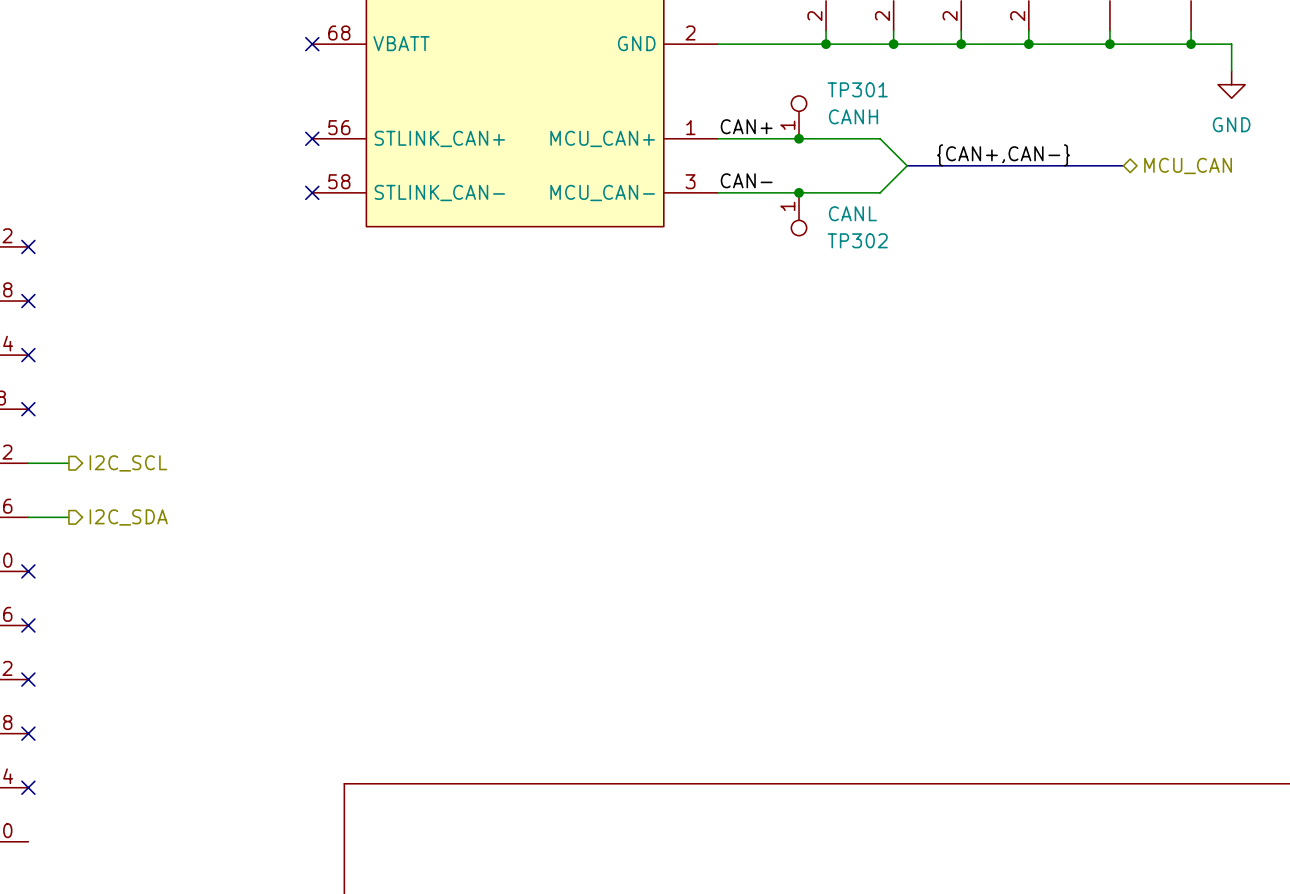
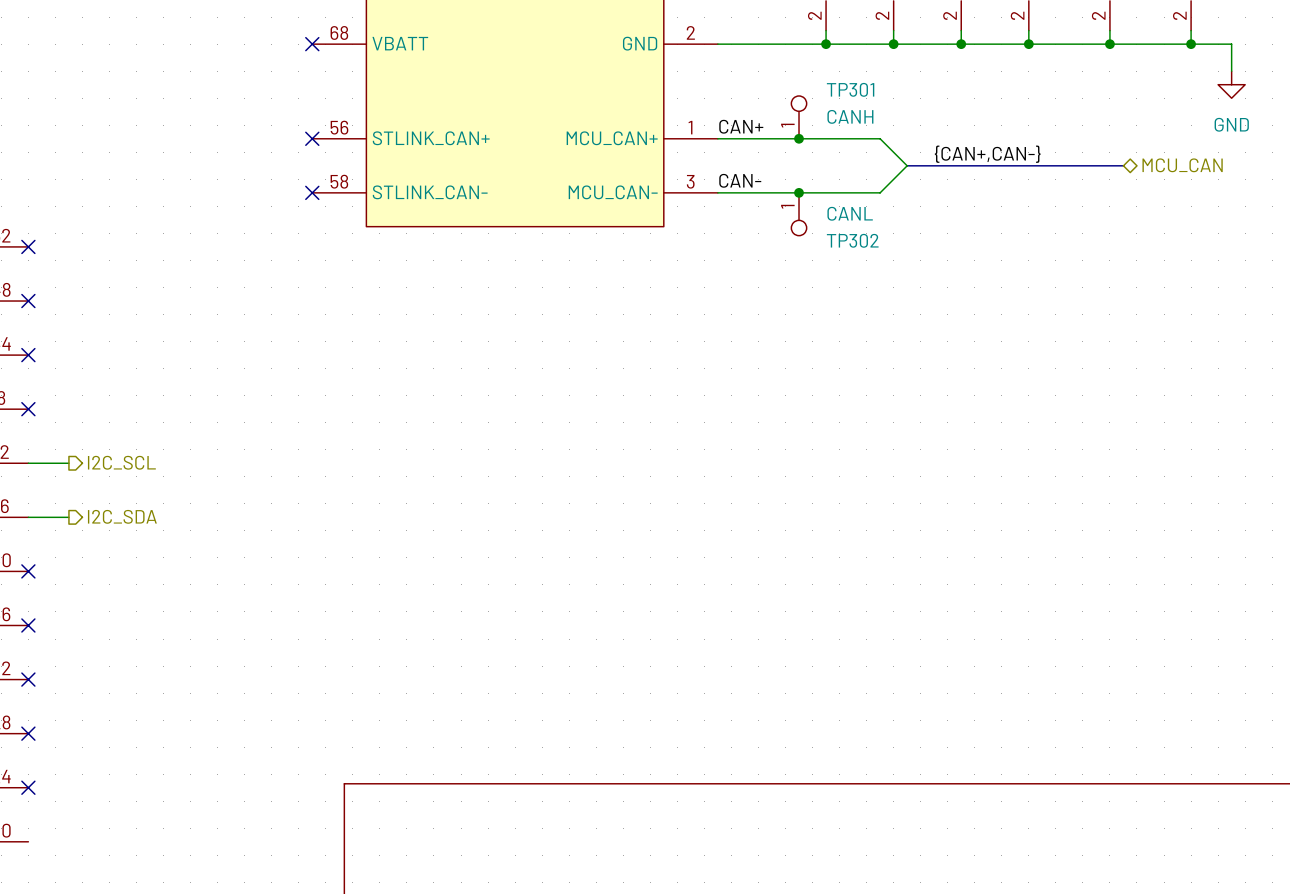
part pin number: none -> 2 (1098, 15)
part pin number: none -> 2 (1179, 15)

